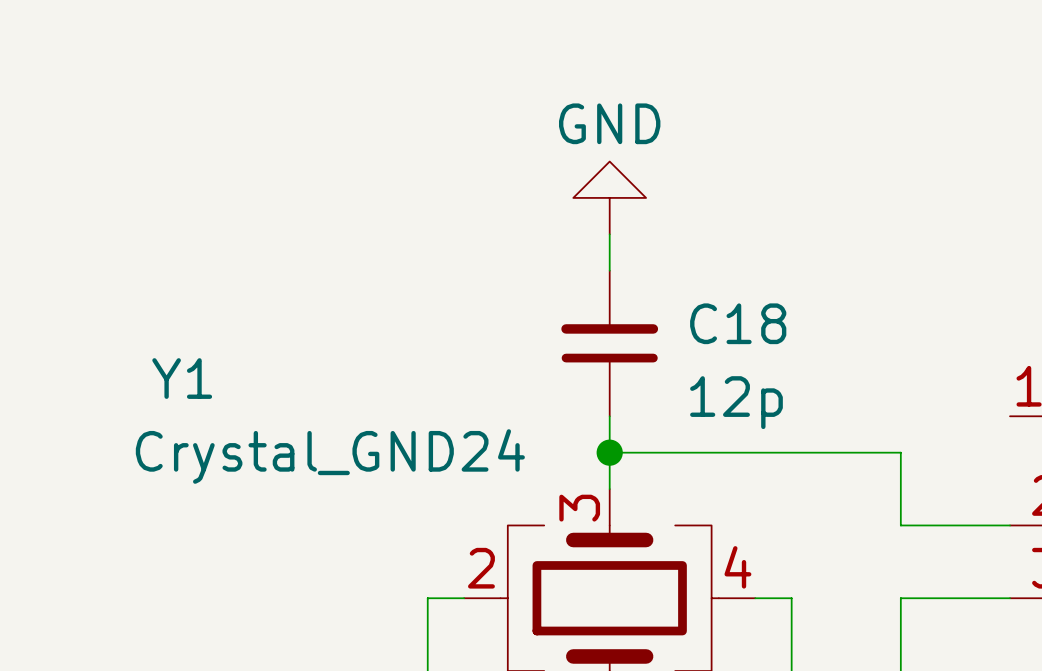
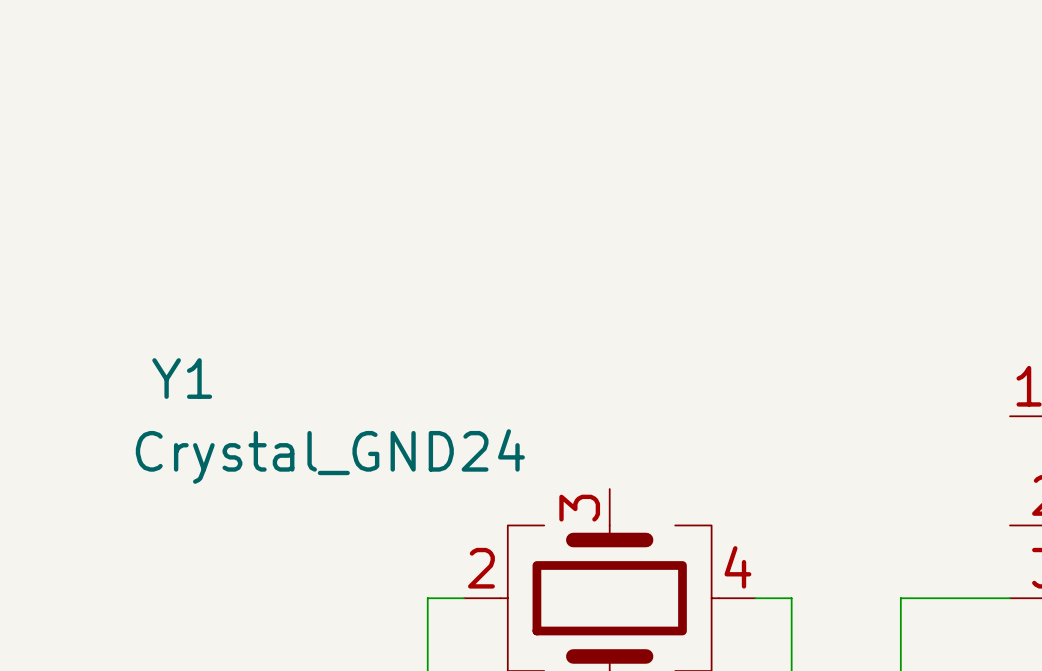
power symbol: GND (609, 197) -> none
wire: (609, 234) (609, 270) -> none
C18: 12p (609, 343) -> none
wire: (609, 416) (609, 489) -> none
wire: (609, 452) (900, 452) (900, 525) (1010, 525) -> none
junction: (609, 452) -> none

